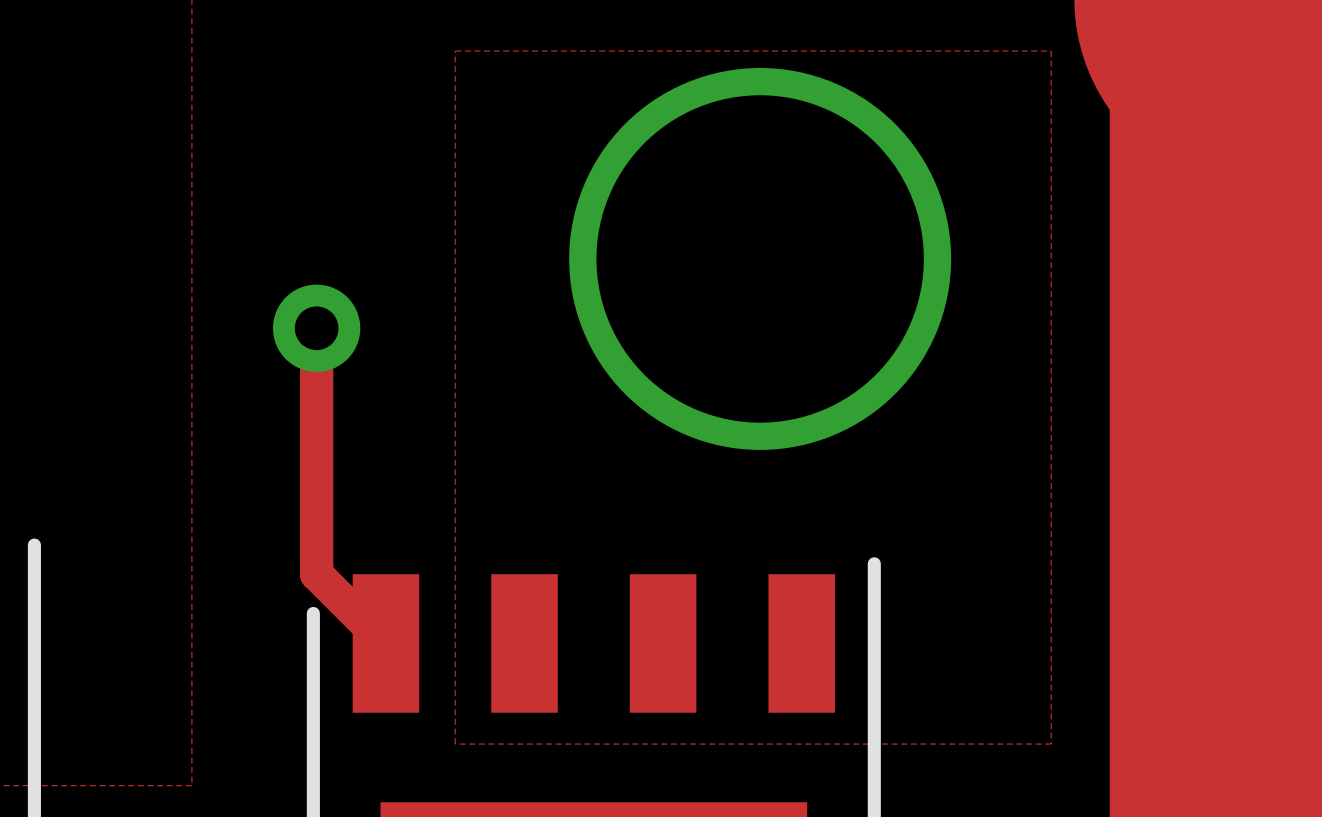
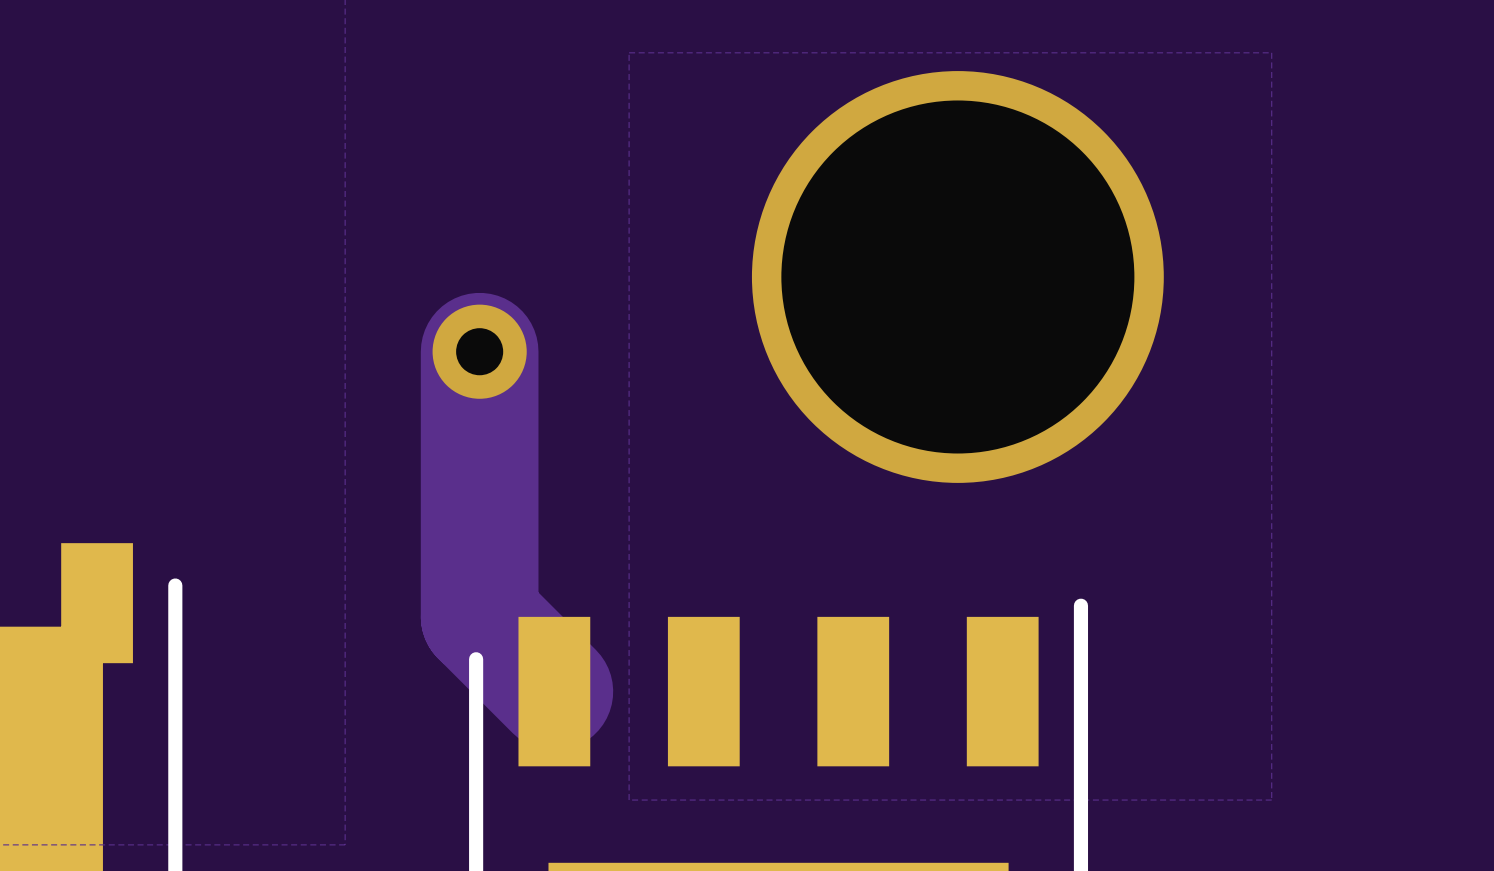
track width: thin (316, 328) (316, 574) (385, 643) -> thick (479, 351) (479, 616) (554, 691)

